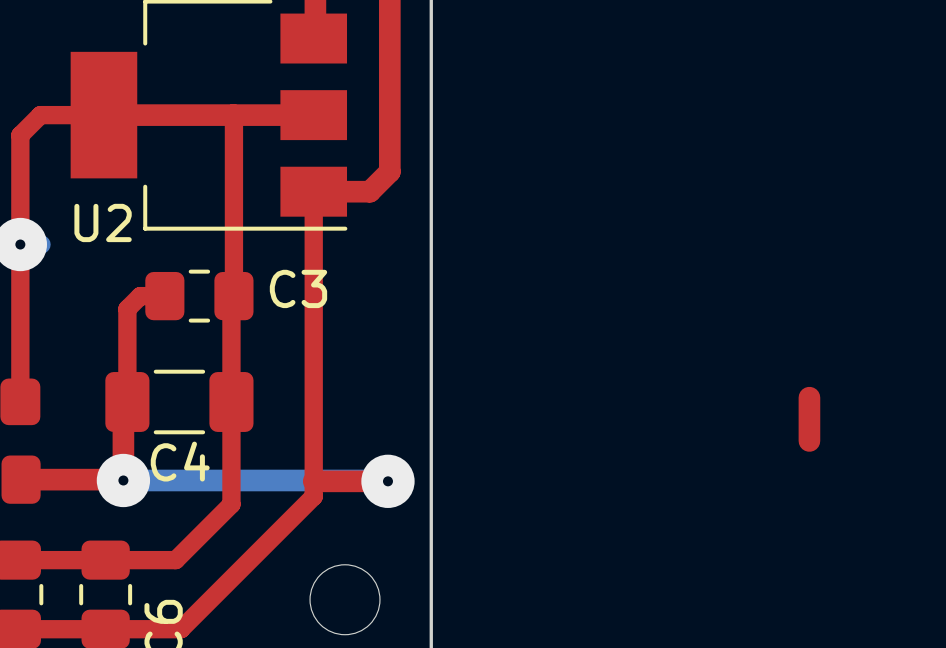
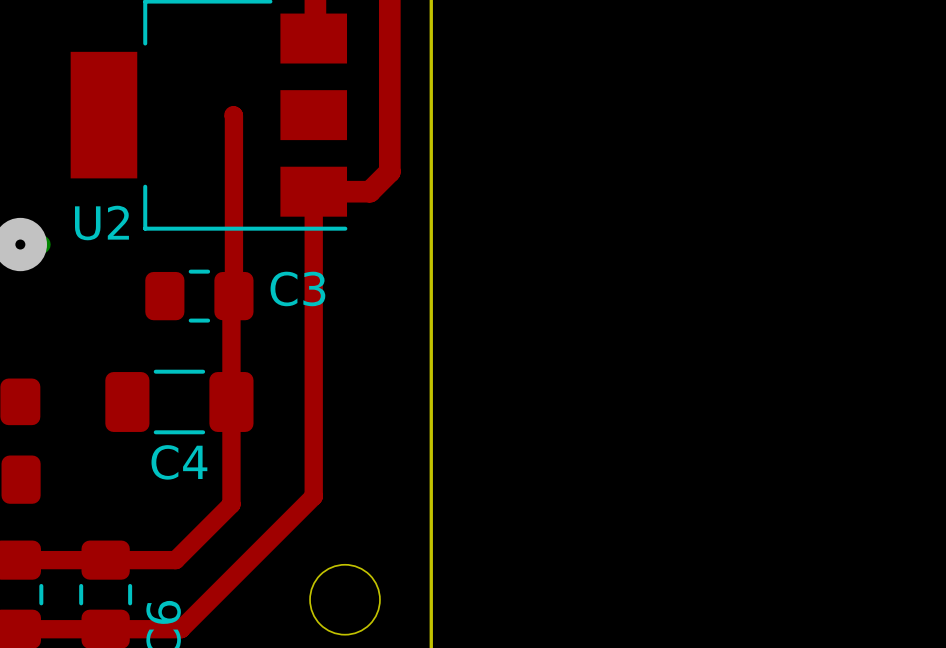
top track: (313, 115) (40, 115) (20, 135) (20, 401) -> none
top track: (164, 296) (140, 296) (127, 309) (127, 402) (123, 405) (123, 480) (21, 479) -> none
top track: (809, 397) (809, 440) -> none
bottom track: (123, 480) (387, 481) -> none
via: (123, 480) -> none
top track: (313, 481) (387, 481) -> none
via: (387, 481) -> none

